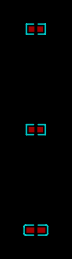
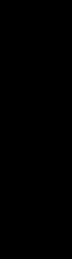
part: (35, 29) -> none
part: (35, 129) -> none
part: (35, 230) -> none

